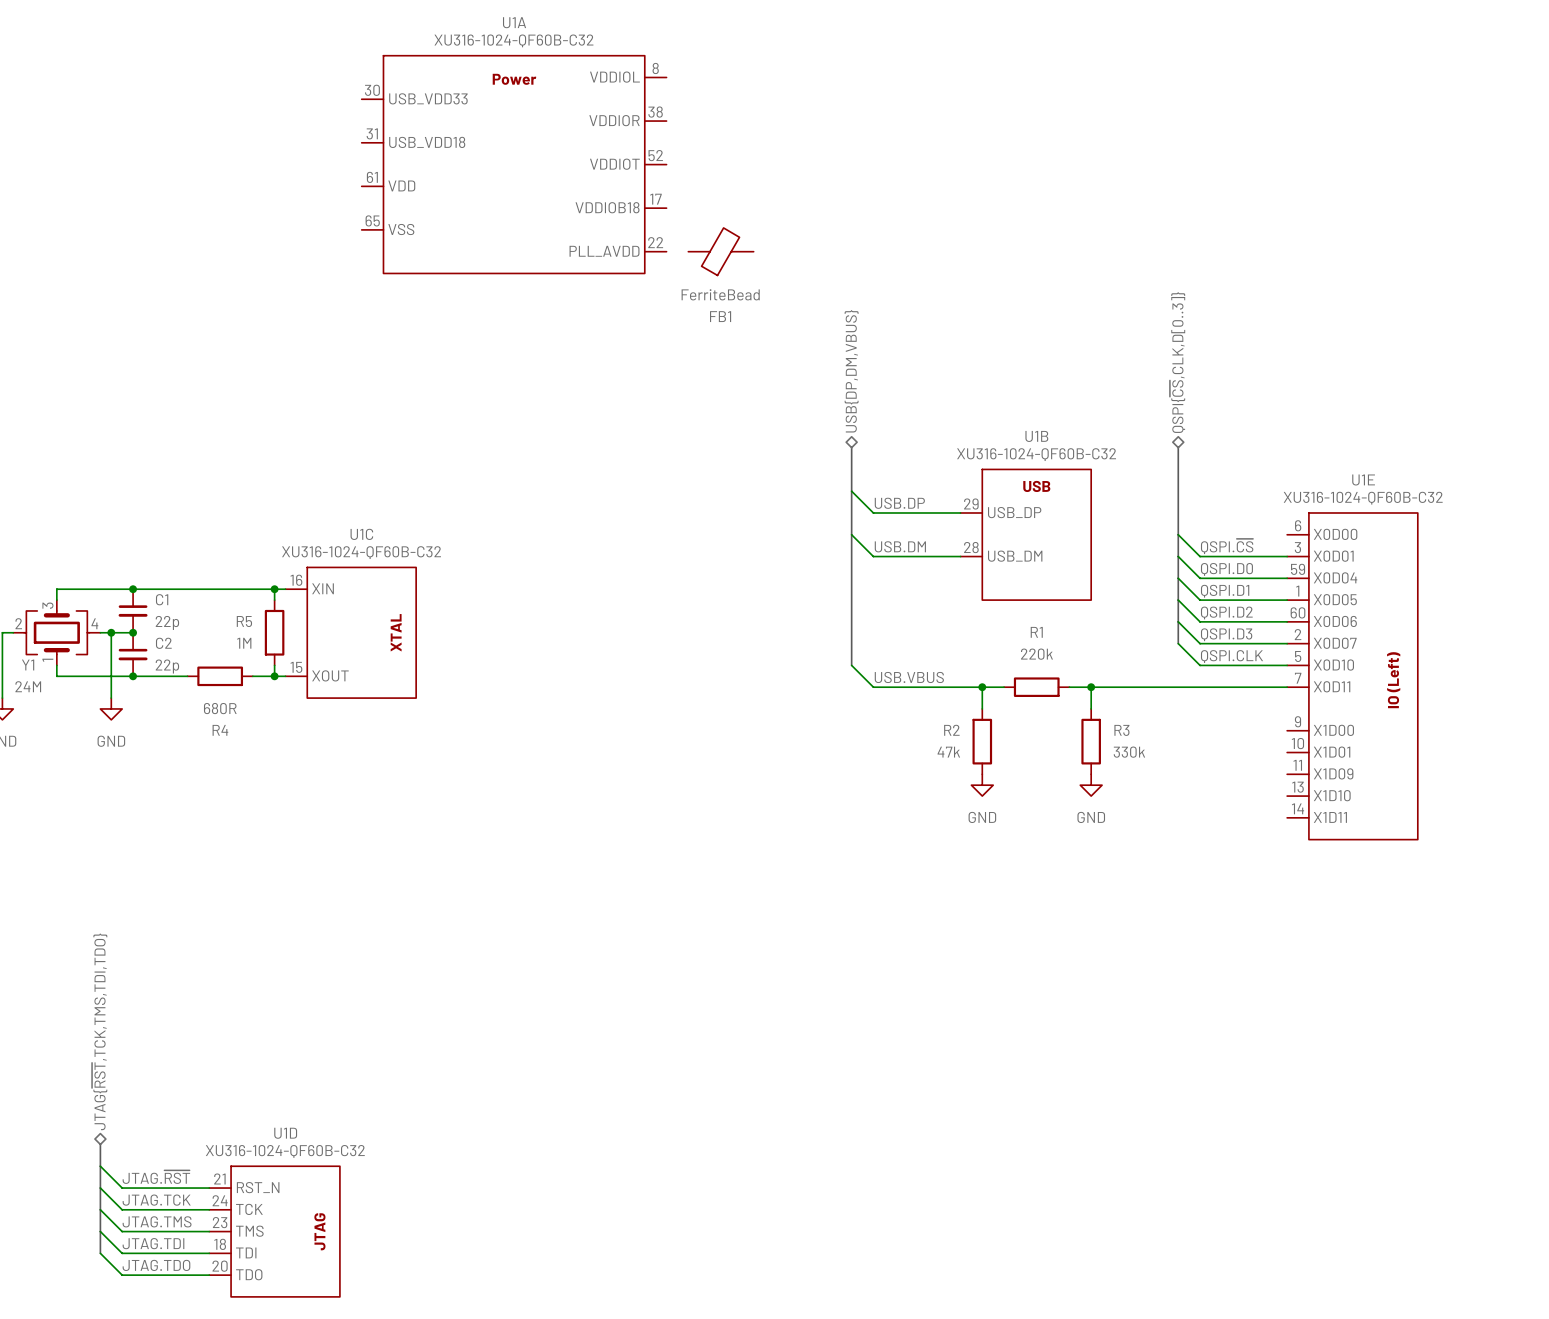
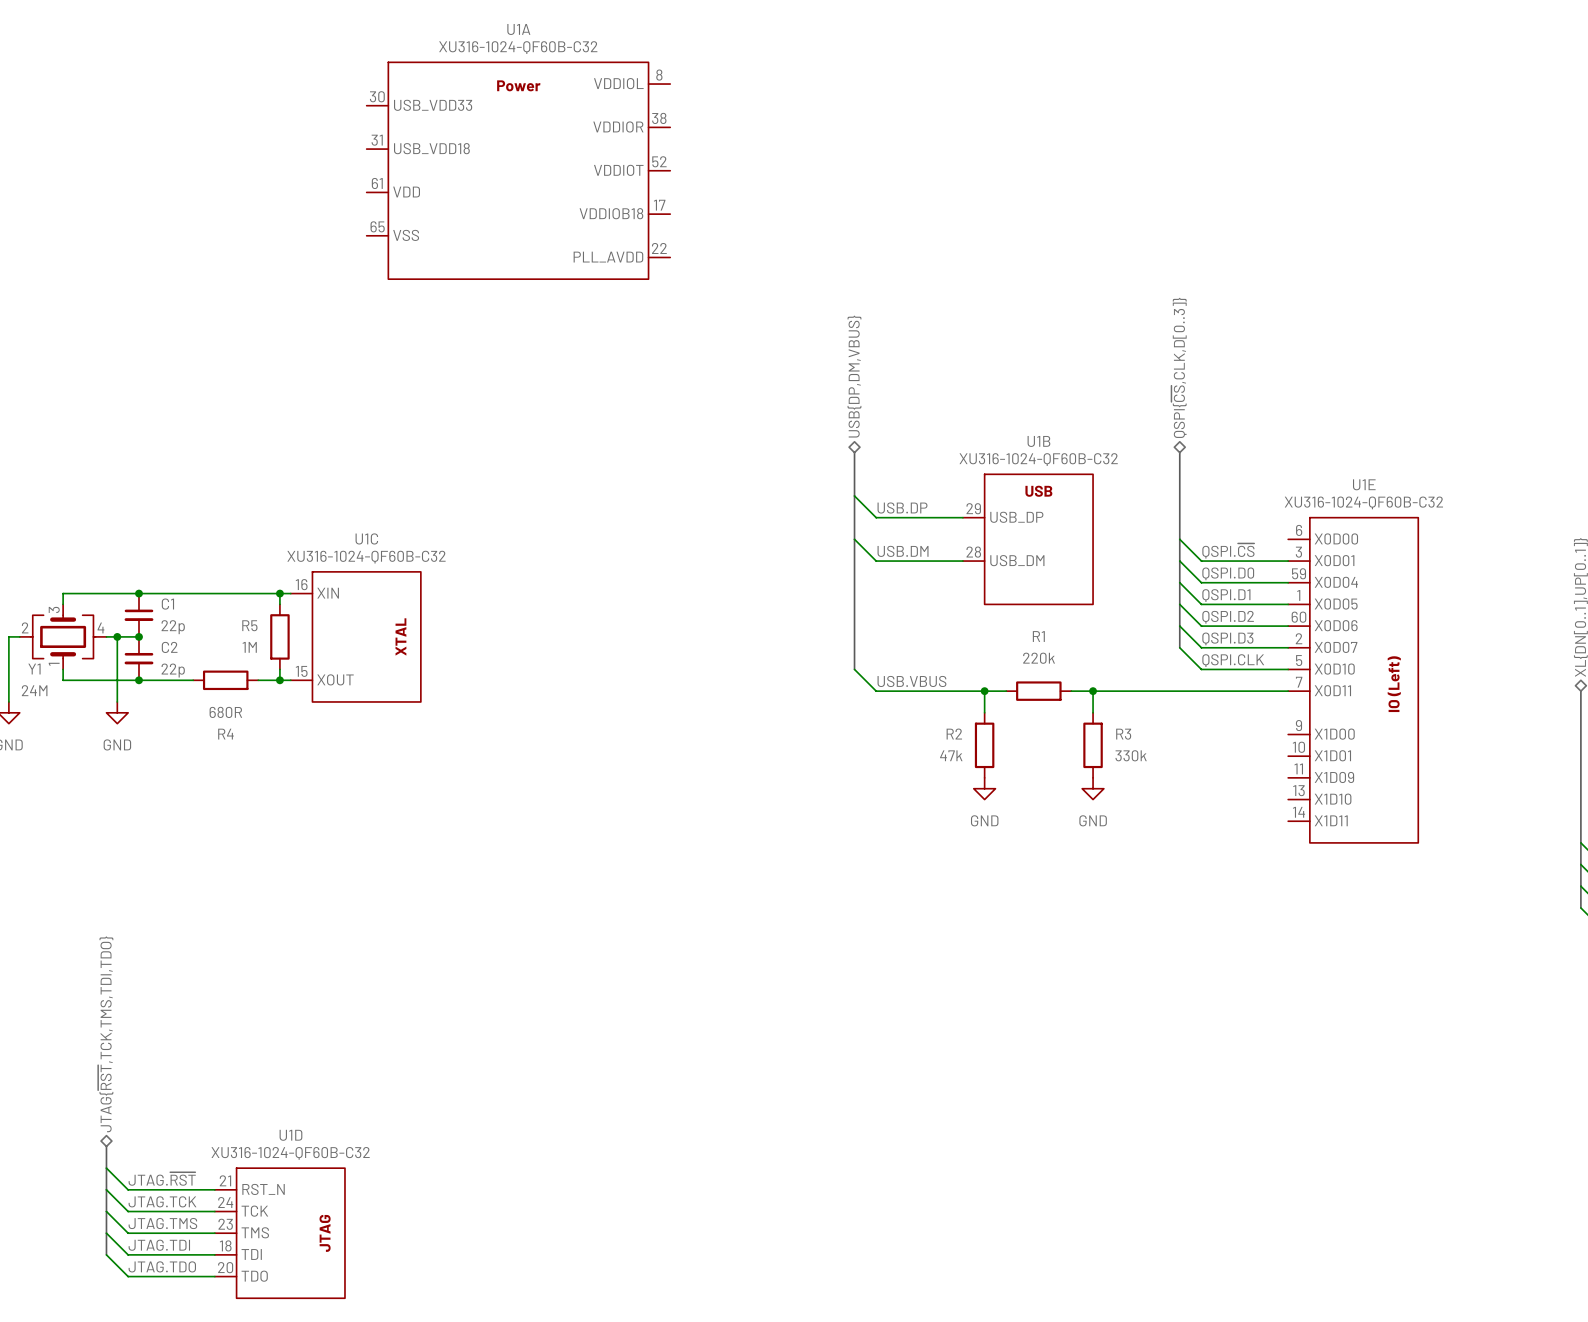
FB1: FerriteBead (720, 251) -> none

